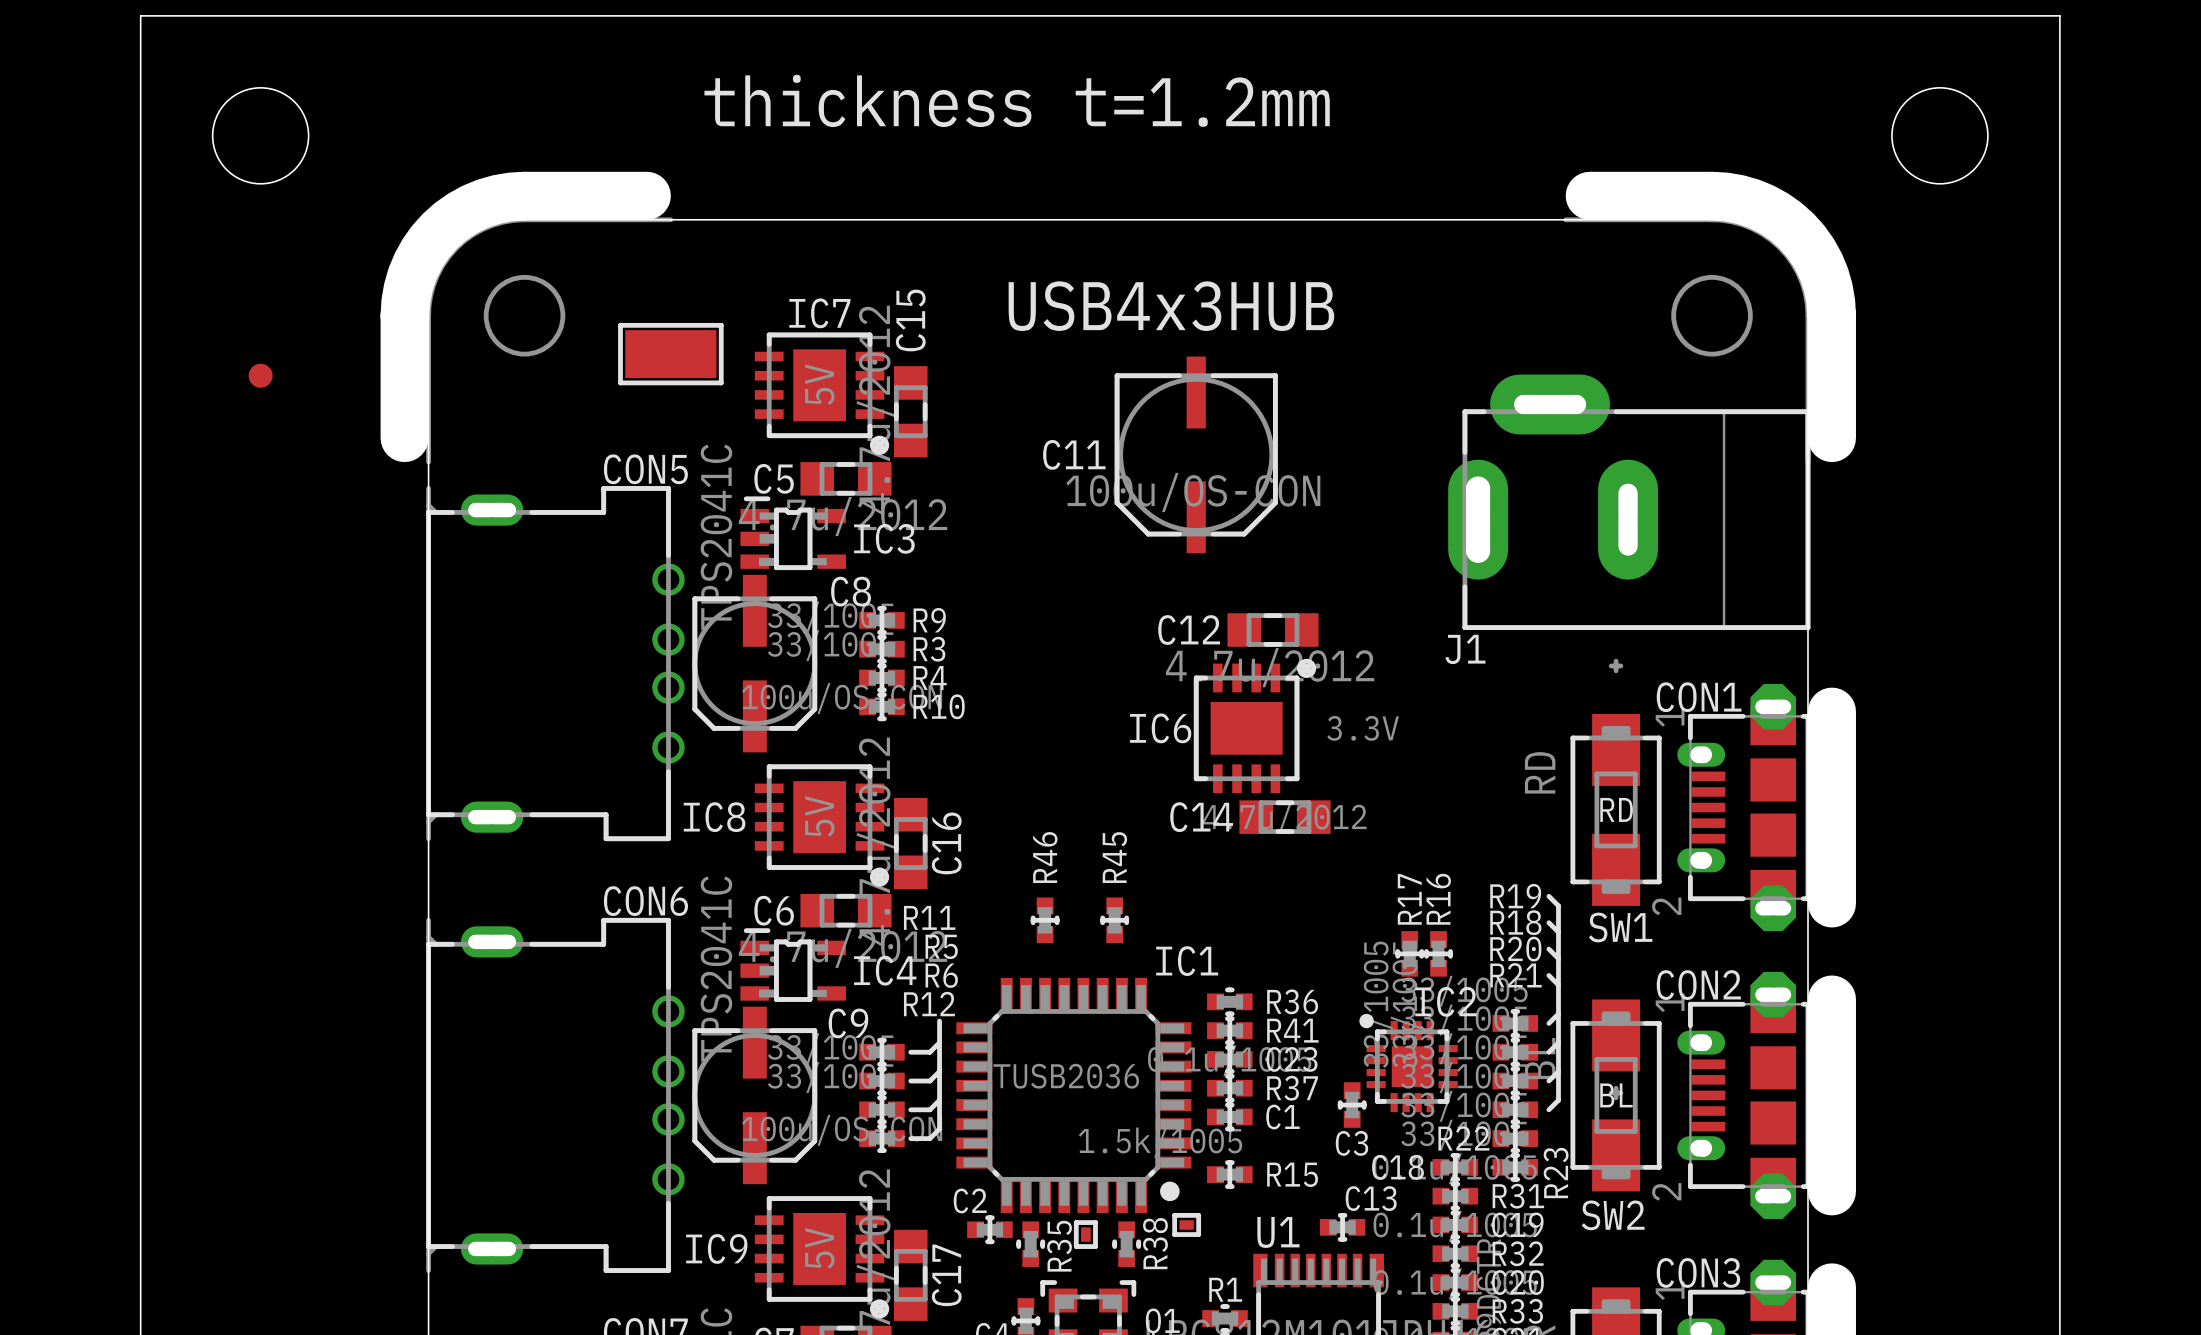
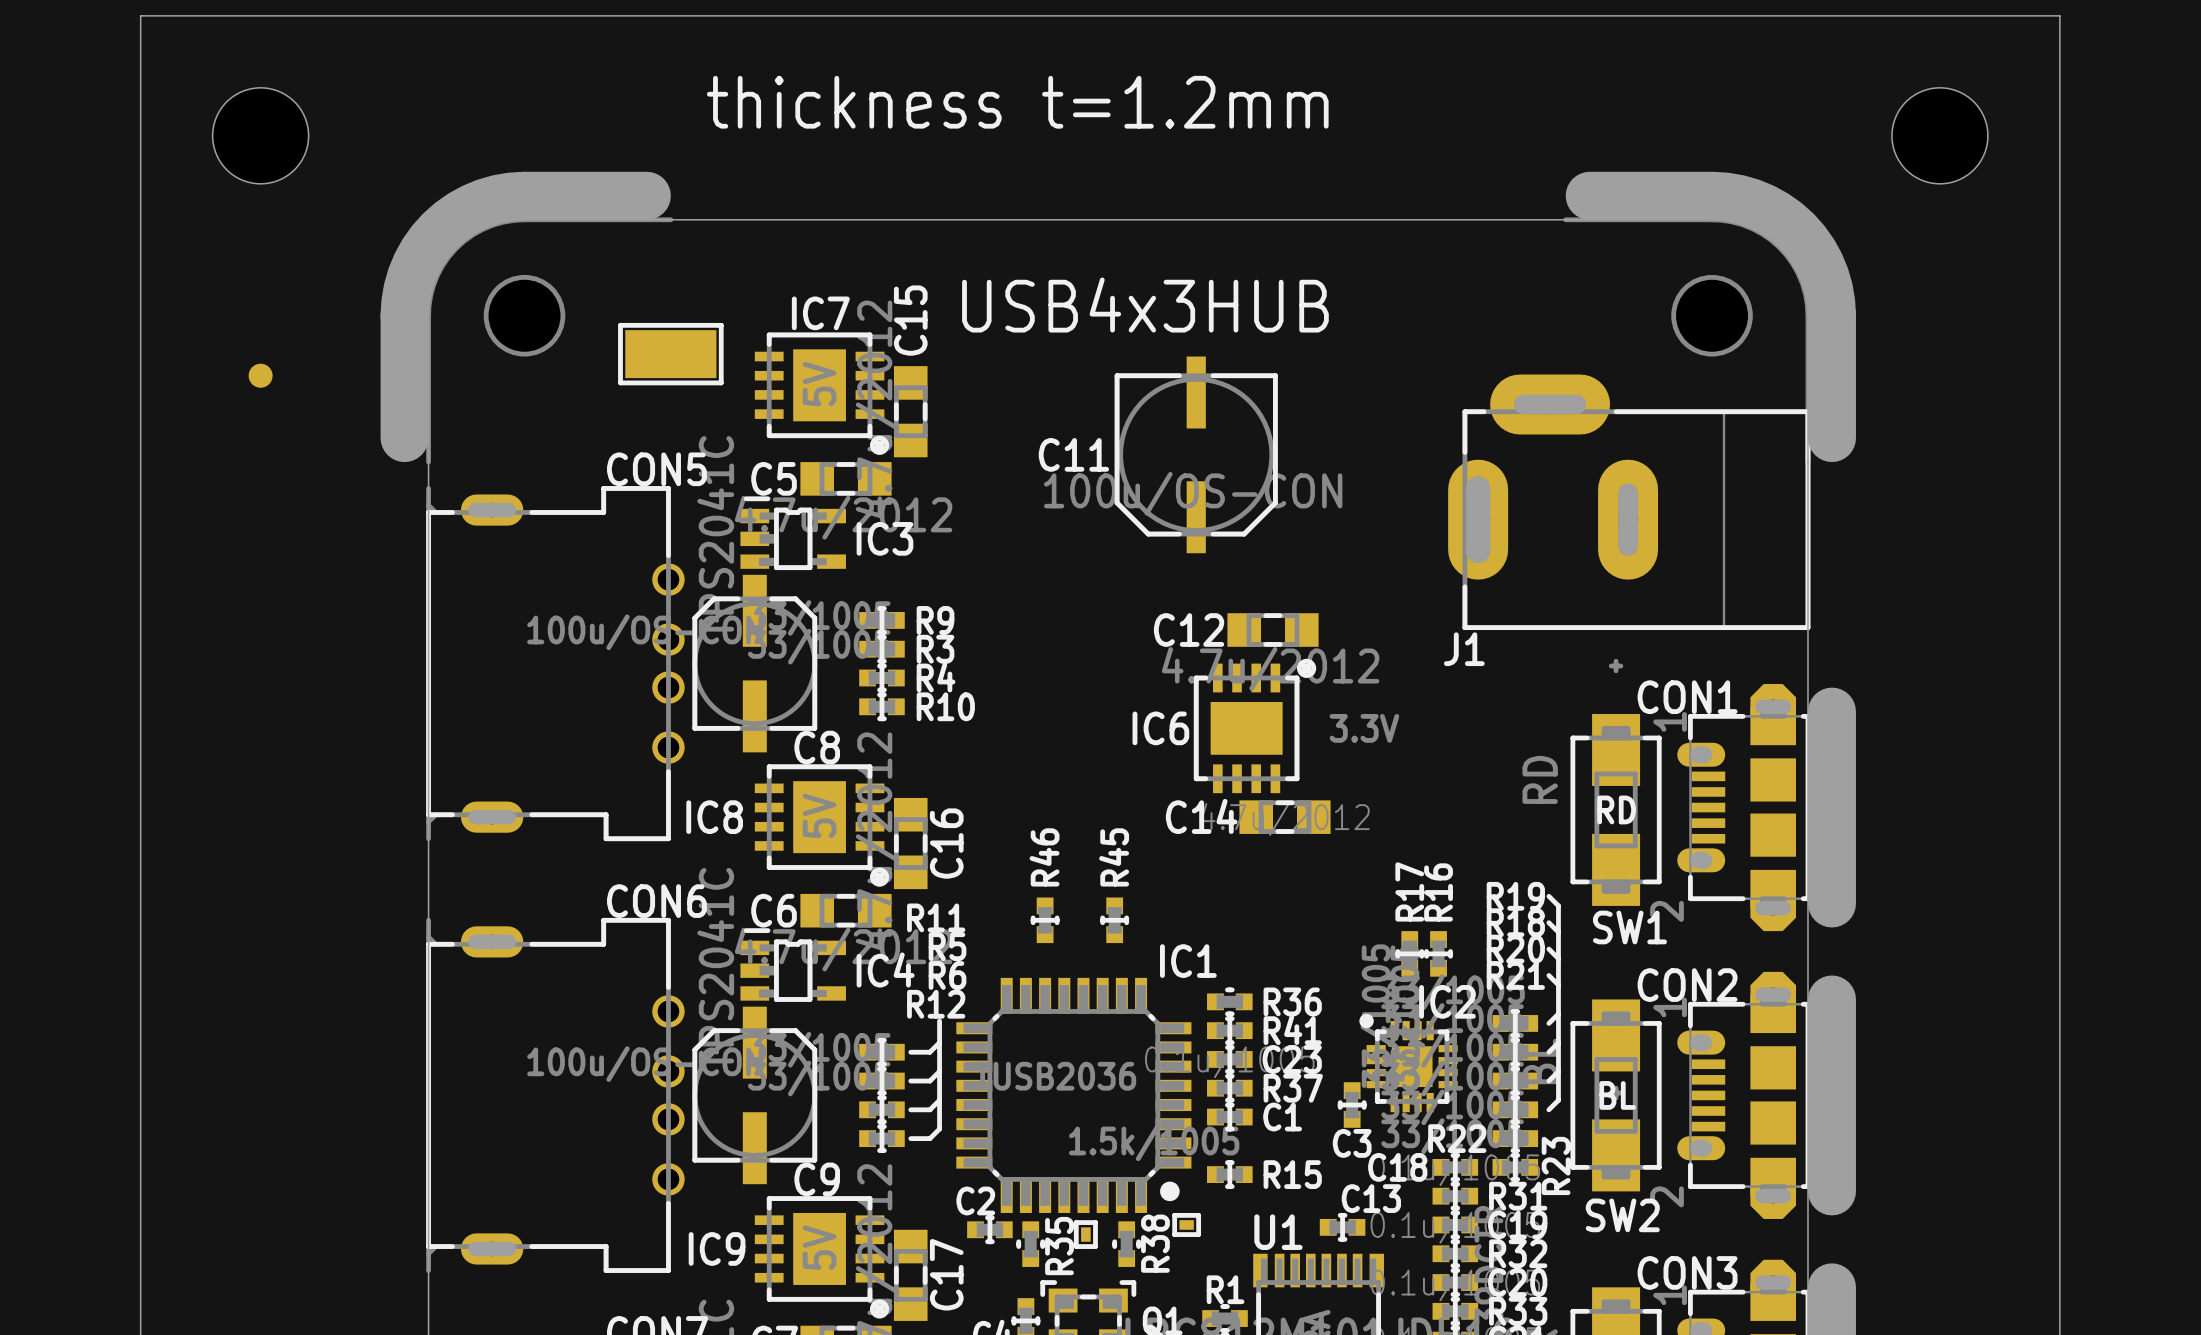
C8 name position: C8 (851, 591) -> C8 (817, 747)
C8 rotation: 0° (754, 663) -> 180° (754, 663)
C9 name position: C9 (848, 1023) -> C9 (817, 1179)
C9 rotation: 0° (754, 1095) -> 180° (754, 1095)

